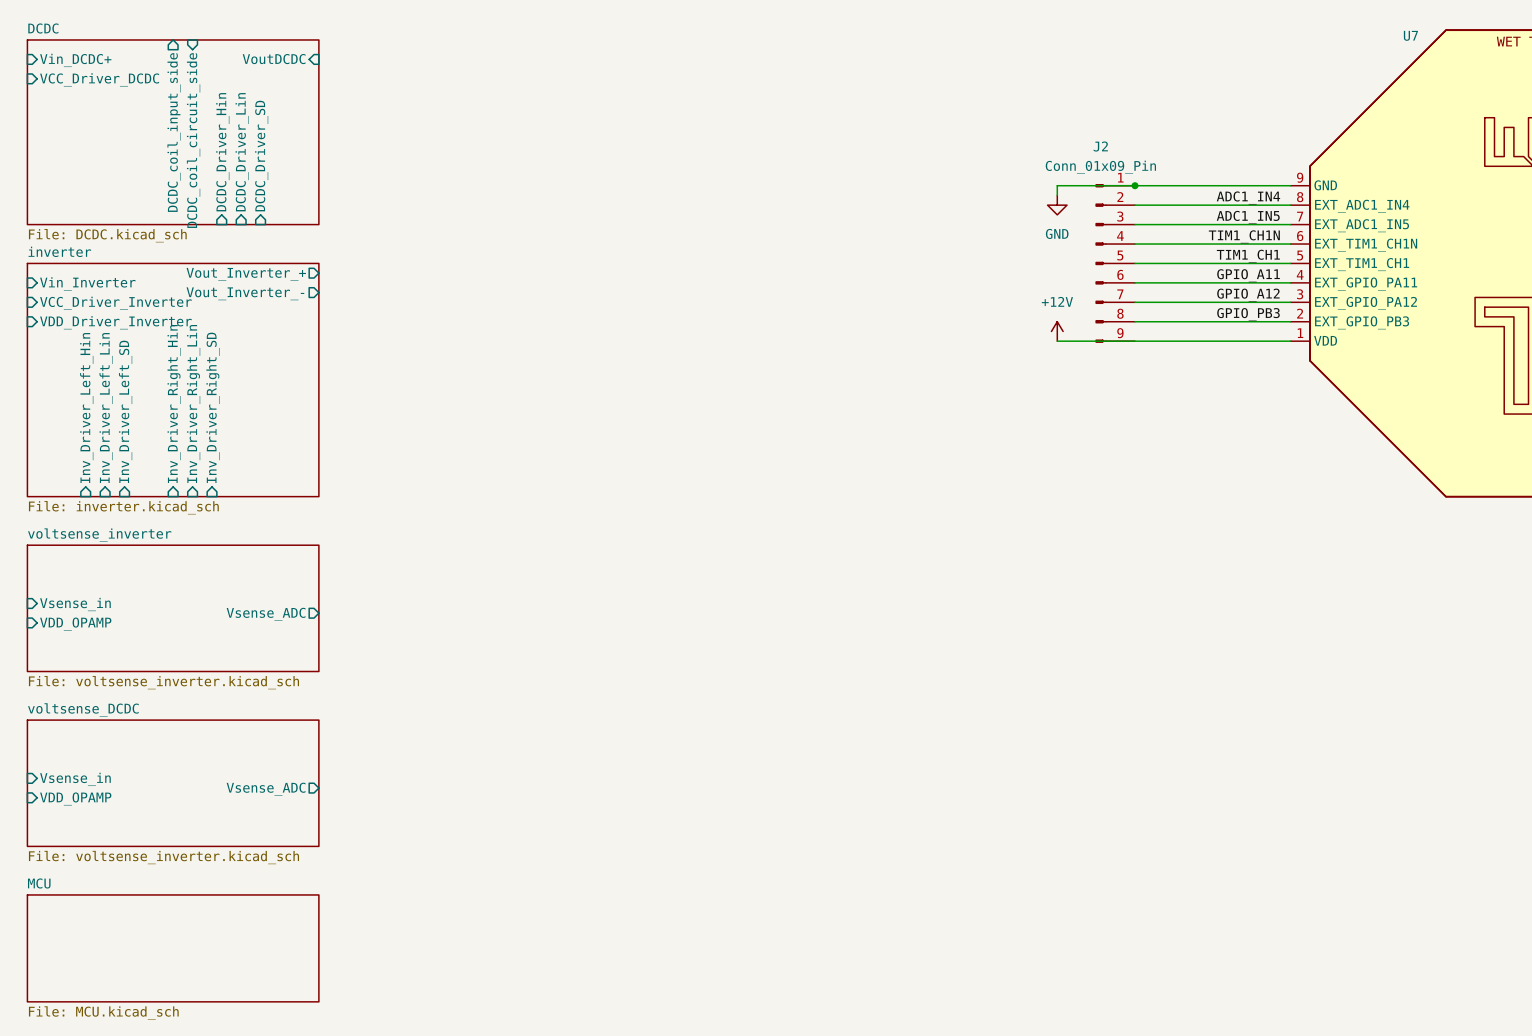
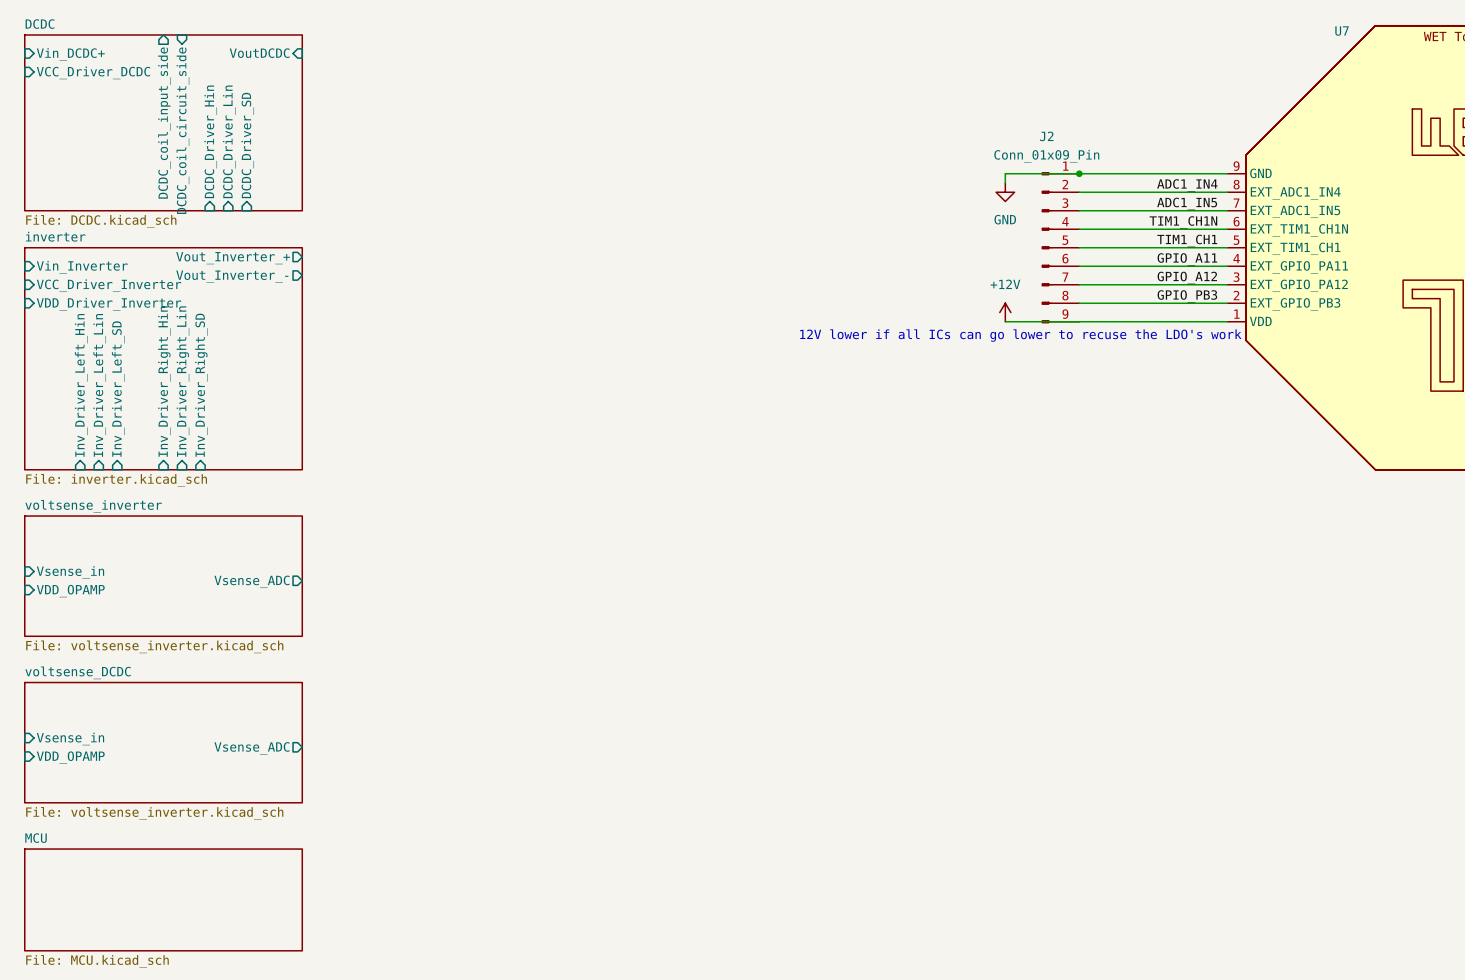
text: none -> 12V lower if all ICs can go lower to recuse the LDO's work (1020, 335)

